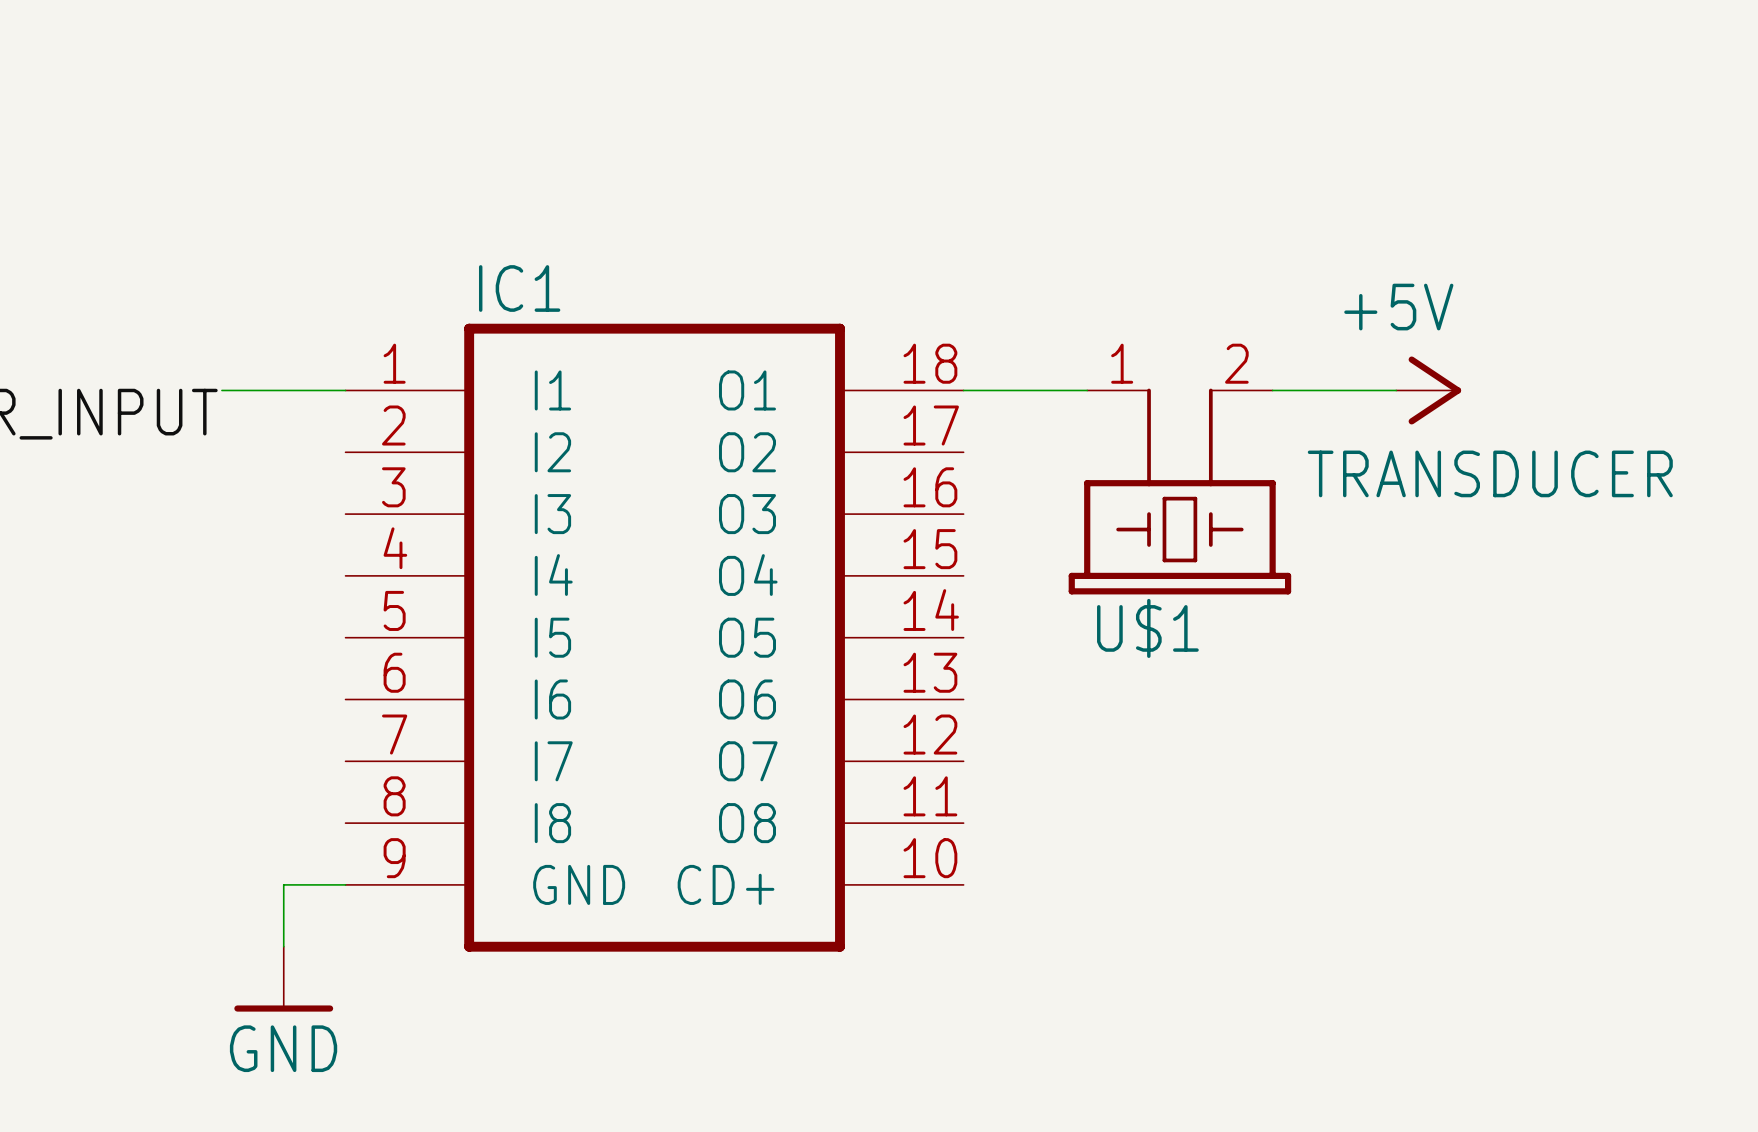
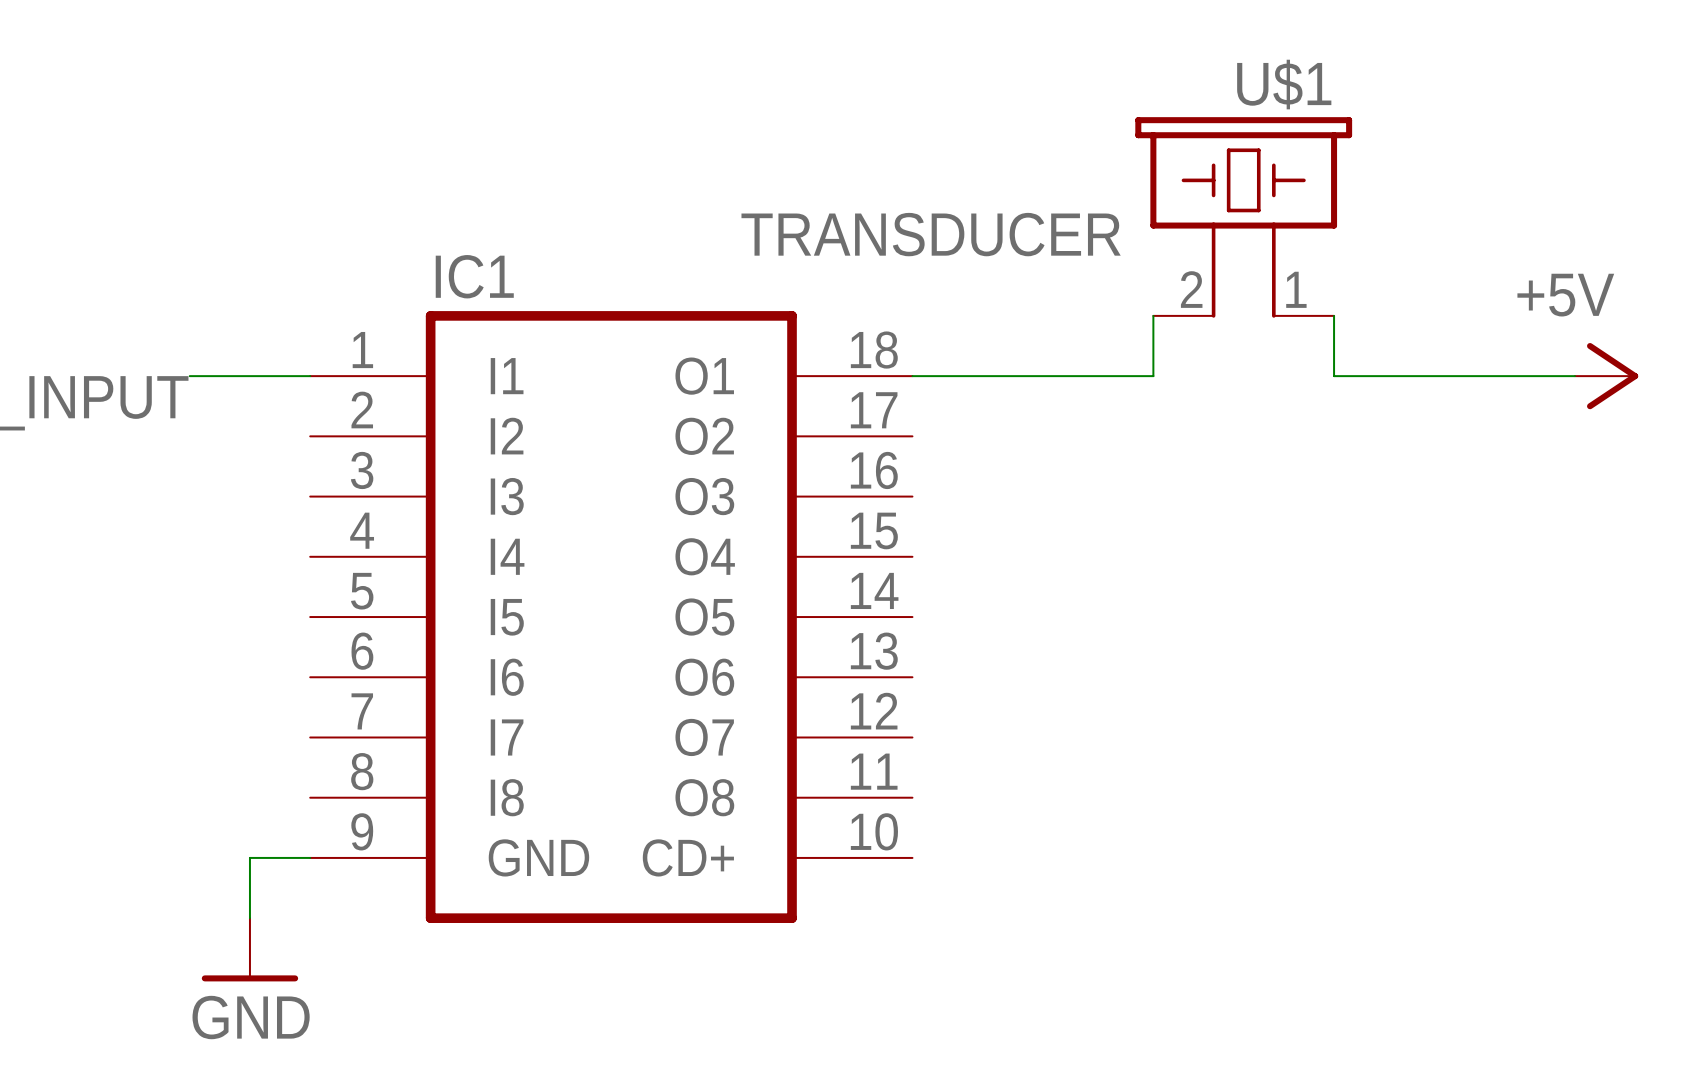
wire: none -> (1153, 315) (1153, 376) (1032, 376)
wire: none -> (1334, 315) (1334, 376) (1574, 376)
wire: (1272, 390) (1396, 390) -> none
power symbol position: +5V (1428, 390) -> +5V (1606, 376)
U$1 rotation: 0° (1179, 491) -> 180° (1243, 217)
U$1 position: (1179, 491) -> (1243, 217)

